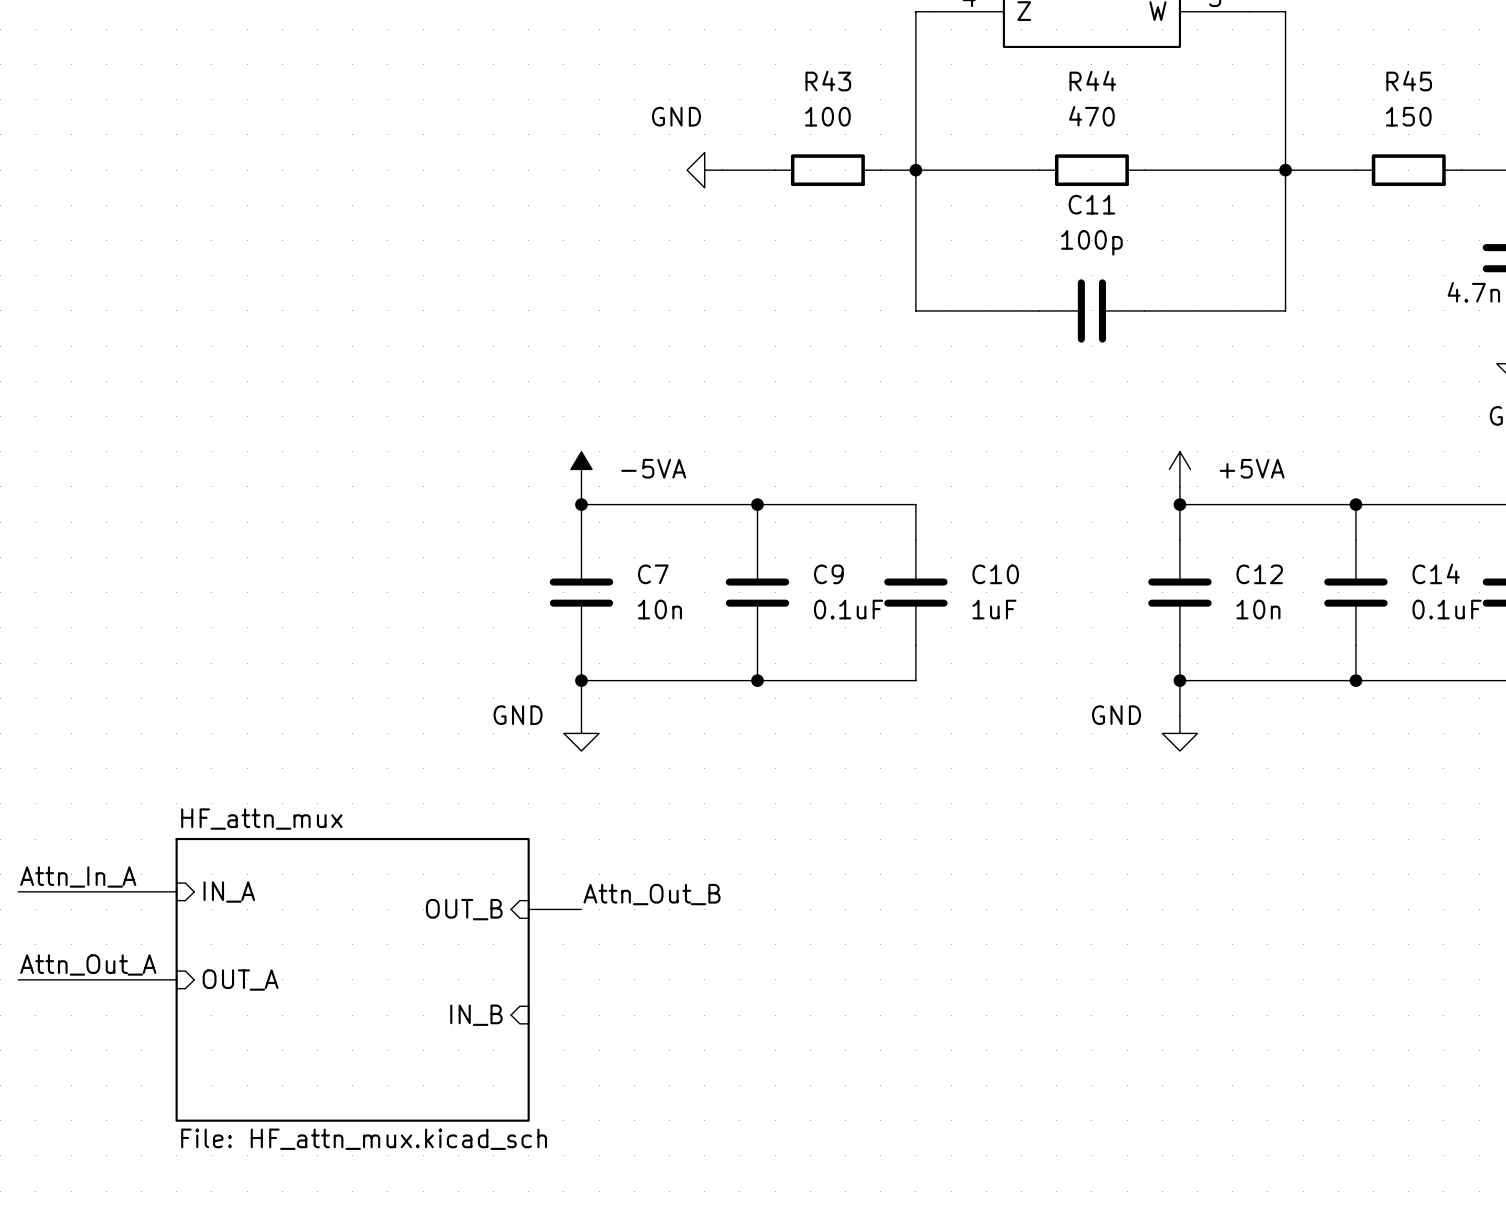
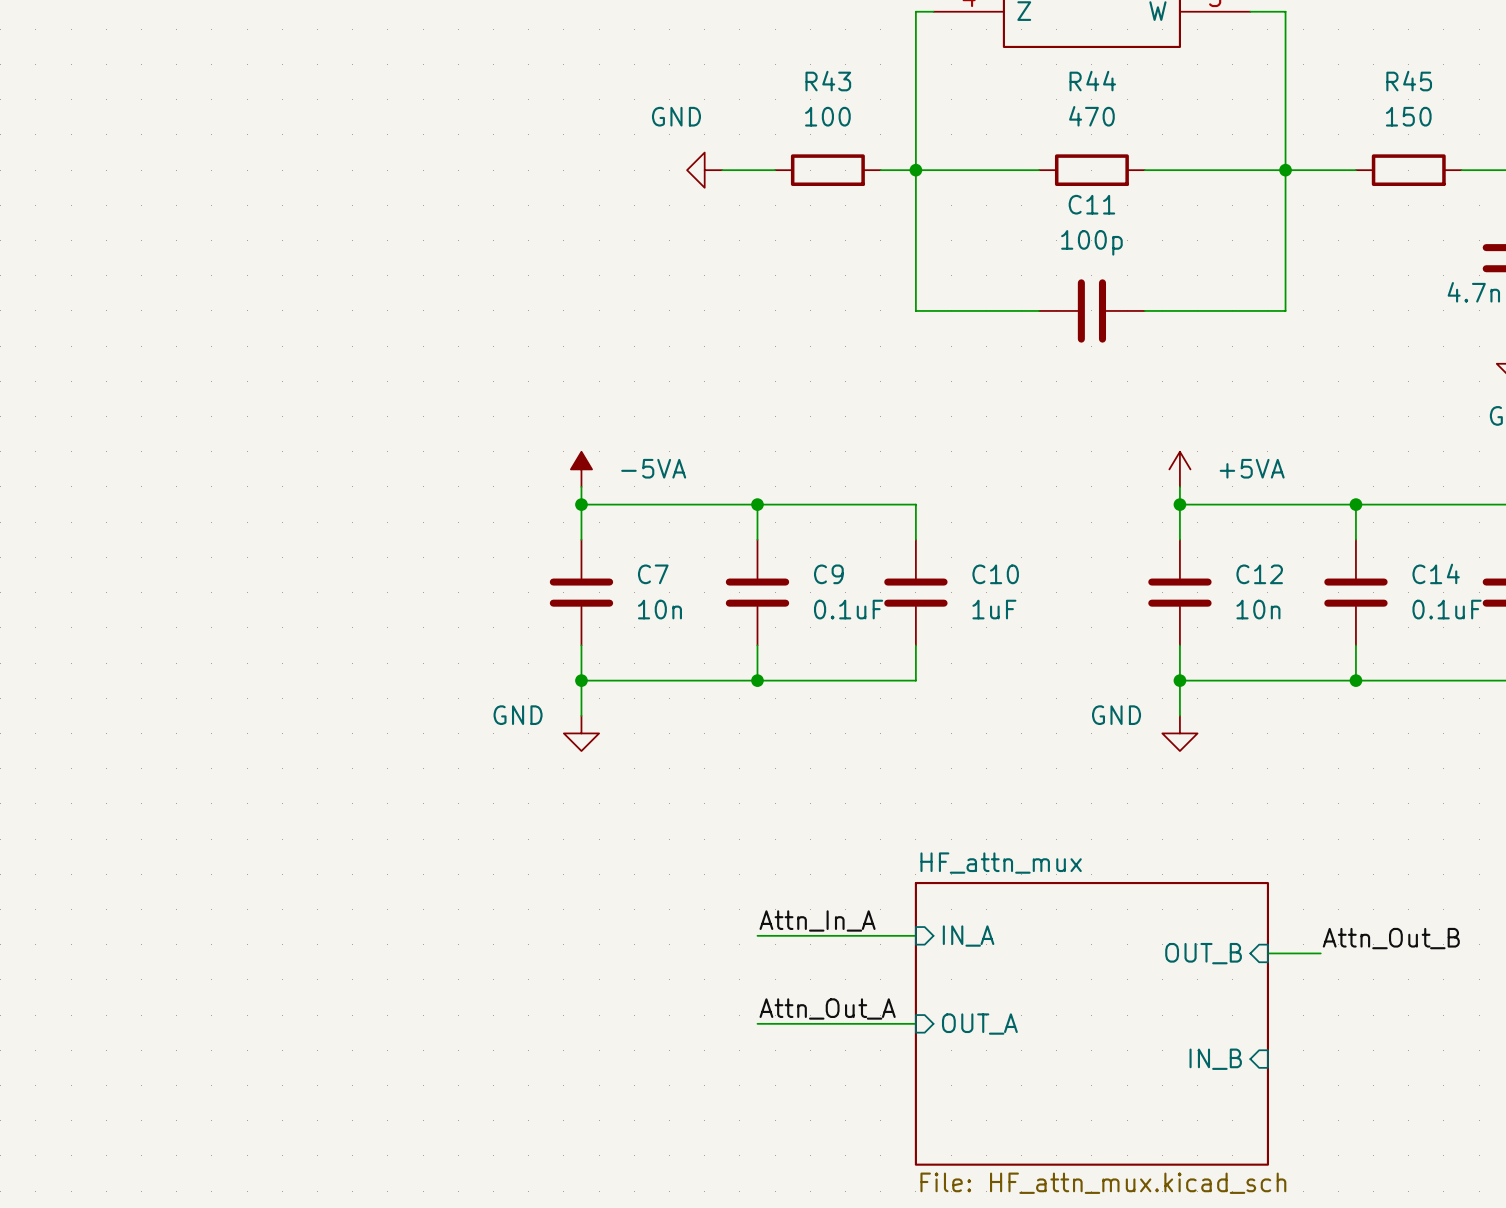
label: Attn_In_A (78, 876) -> none
wire: (18, 891) (176, 891) -> none
sheet pin: IN_A (229, 892) -> none
label: Attn_Out_B (652, 894) -> Attn_In_A (817, 920)
sheet pin: OUT_B (464, 909) -> none
wire: (528, 909) (581, 909) -> none
wire: none -> (757, 935) (915, 935)
sheet pin: none -> IN_A (968, 936)
label: none -> Attn_Out_B (1391, 938)
sheet pin: none -> OUT_B (1203, 953)
wire: none -> (1267, 953) (1320, 953)
label: Attn_Out_A (88, 964) -> none
wire: (18, 979) (176, 979) -> none
sheet HF_attn_mux: File: HF_attn_mux.kicad_sch (352, 979) -> none
sheet pin: OUT_A (240, 980) -> none
label: none -> Attn_Out_A (827, 1008)
sheet pin: IN_B (476, 1015) -> none
wire: none -> (757, 1023) (915, 1023)
sheet HF_attn_mux: none -> File: HF_attn_mux.kicad_sch (1091, 1023)
sheet pin: none -> OUT_A (979, 1024)
sheet pin: none -> IN_B (1215, 1059)

